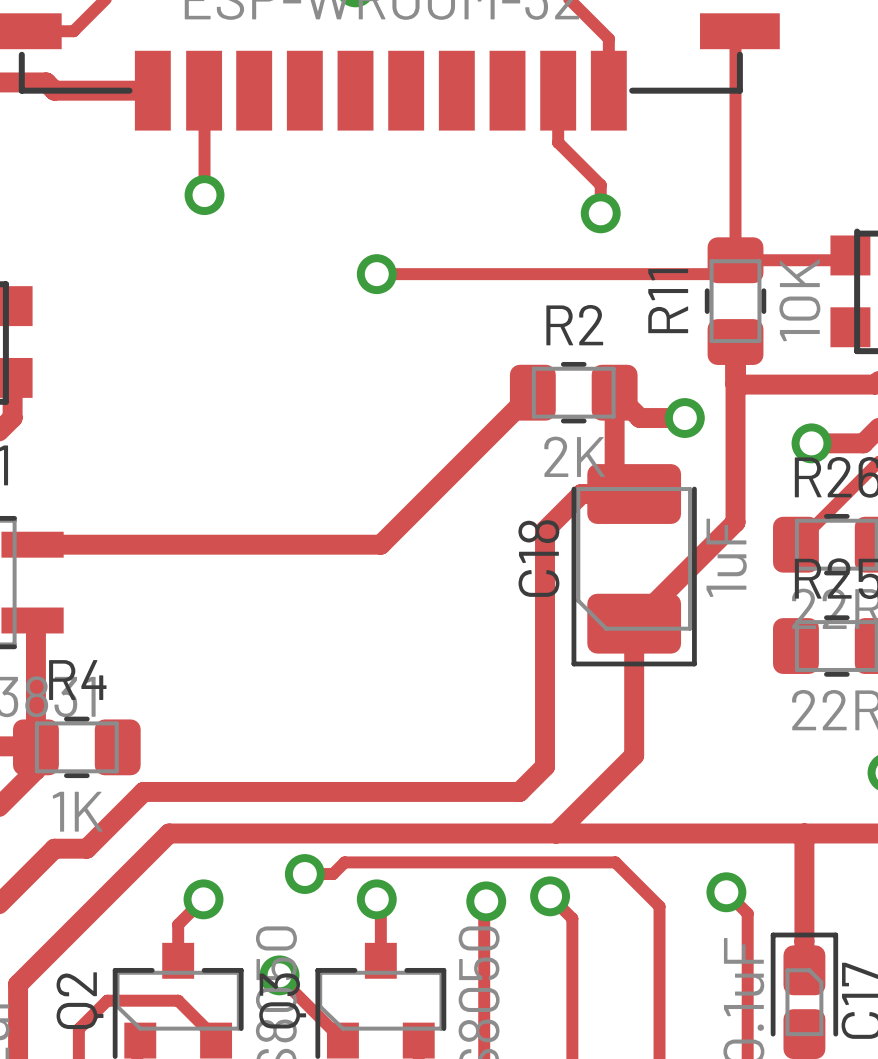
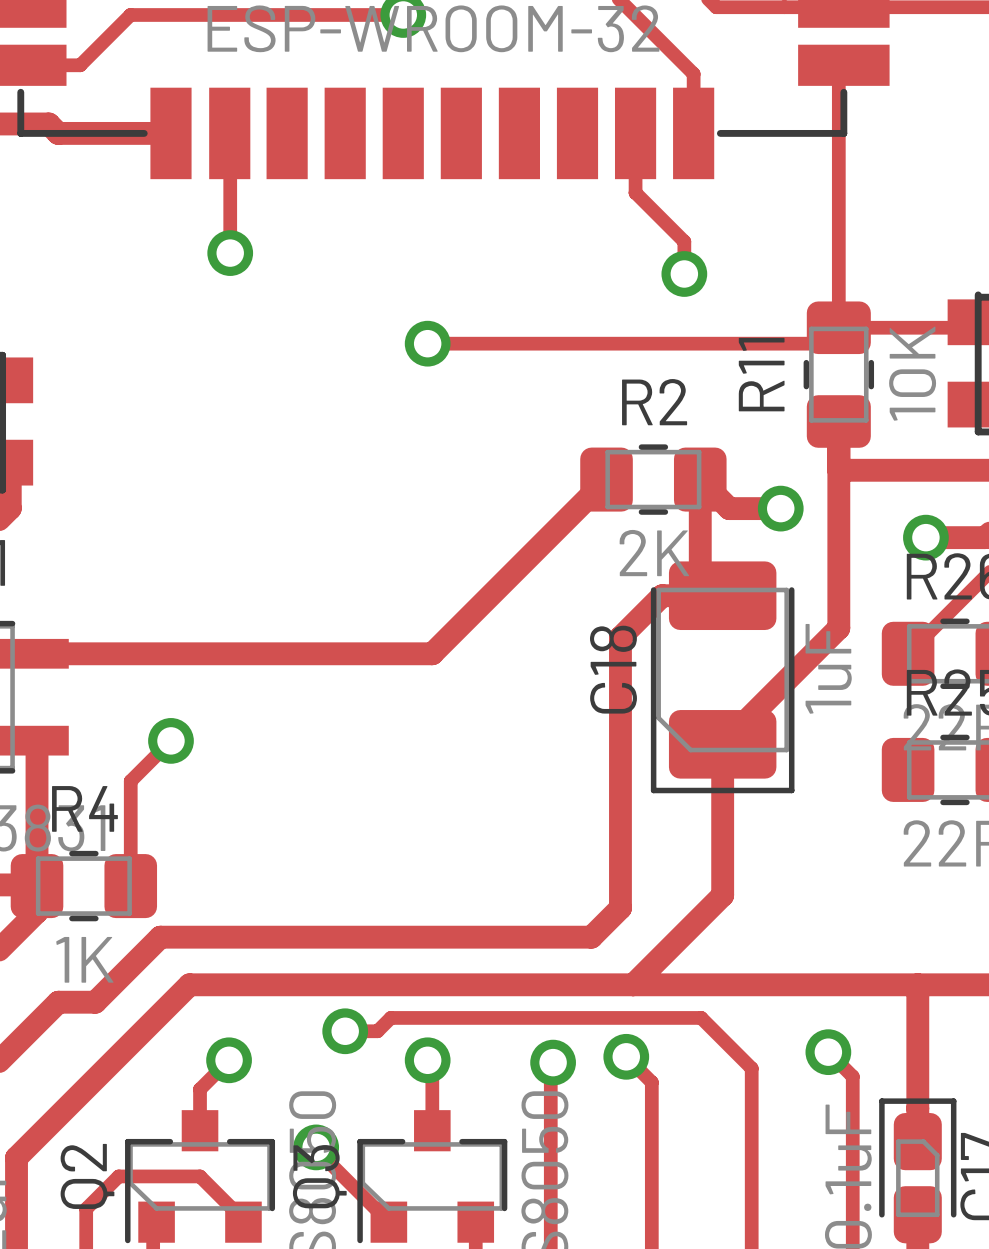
track: none -> (170, 740) (130, 781) (130, 886)
via: none -> (170, 740)

